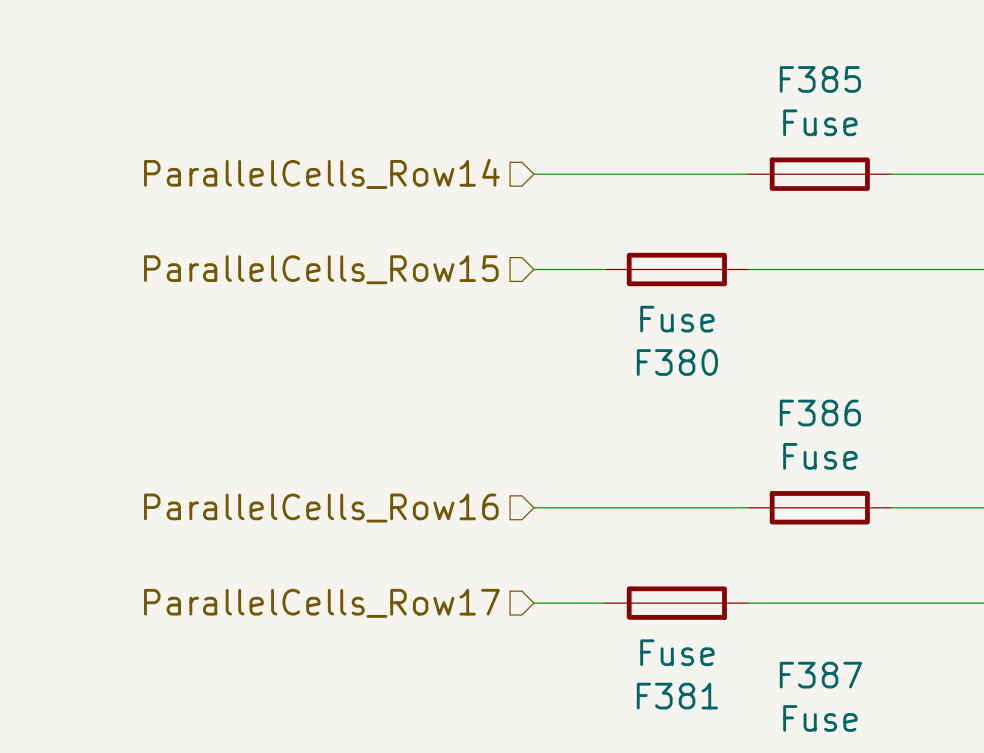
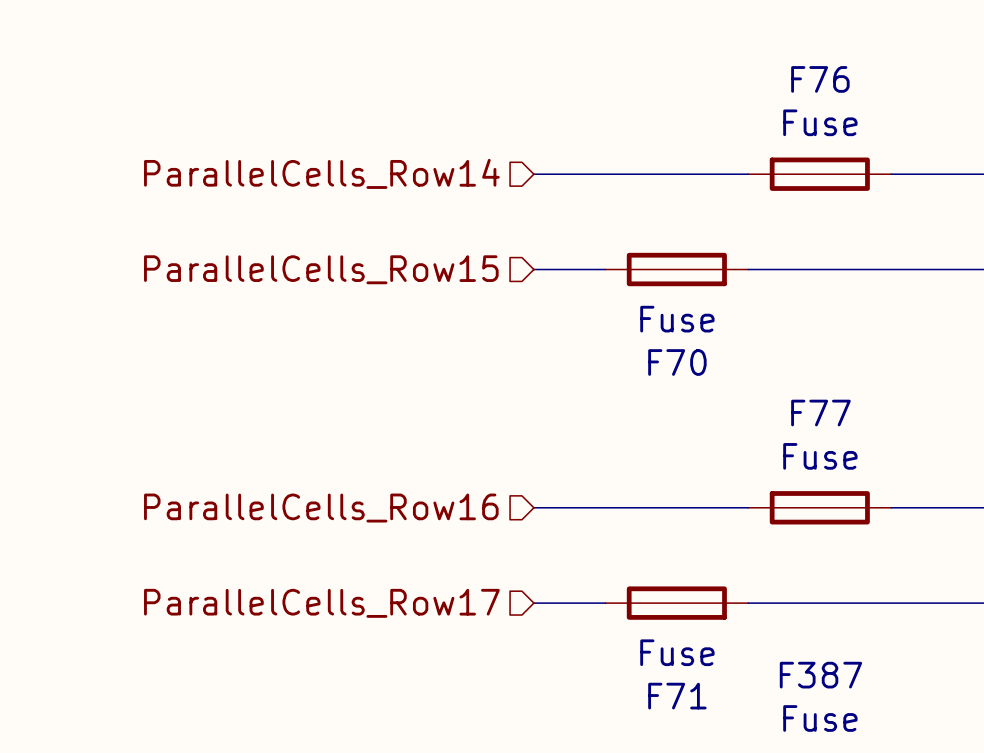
F385 name: F385 (820, 79) -> F76 (820, 79)
F380 name: F380 (677, 362) -> F70 (677, 362)
F386 name: F386 (820, 413) -> F77 (820, 413)
F381 name: F381 (677, 696) -> F71 (677, 696)

